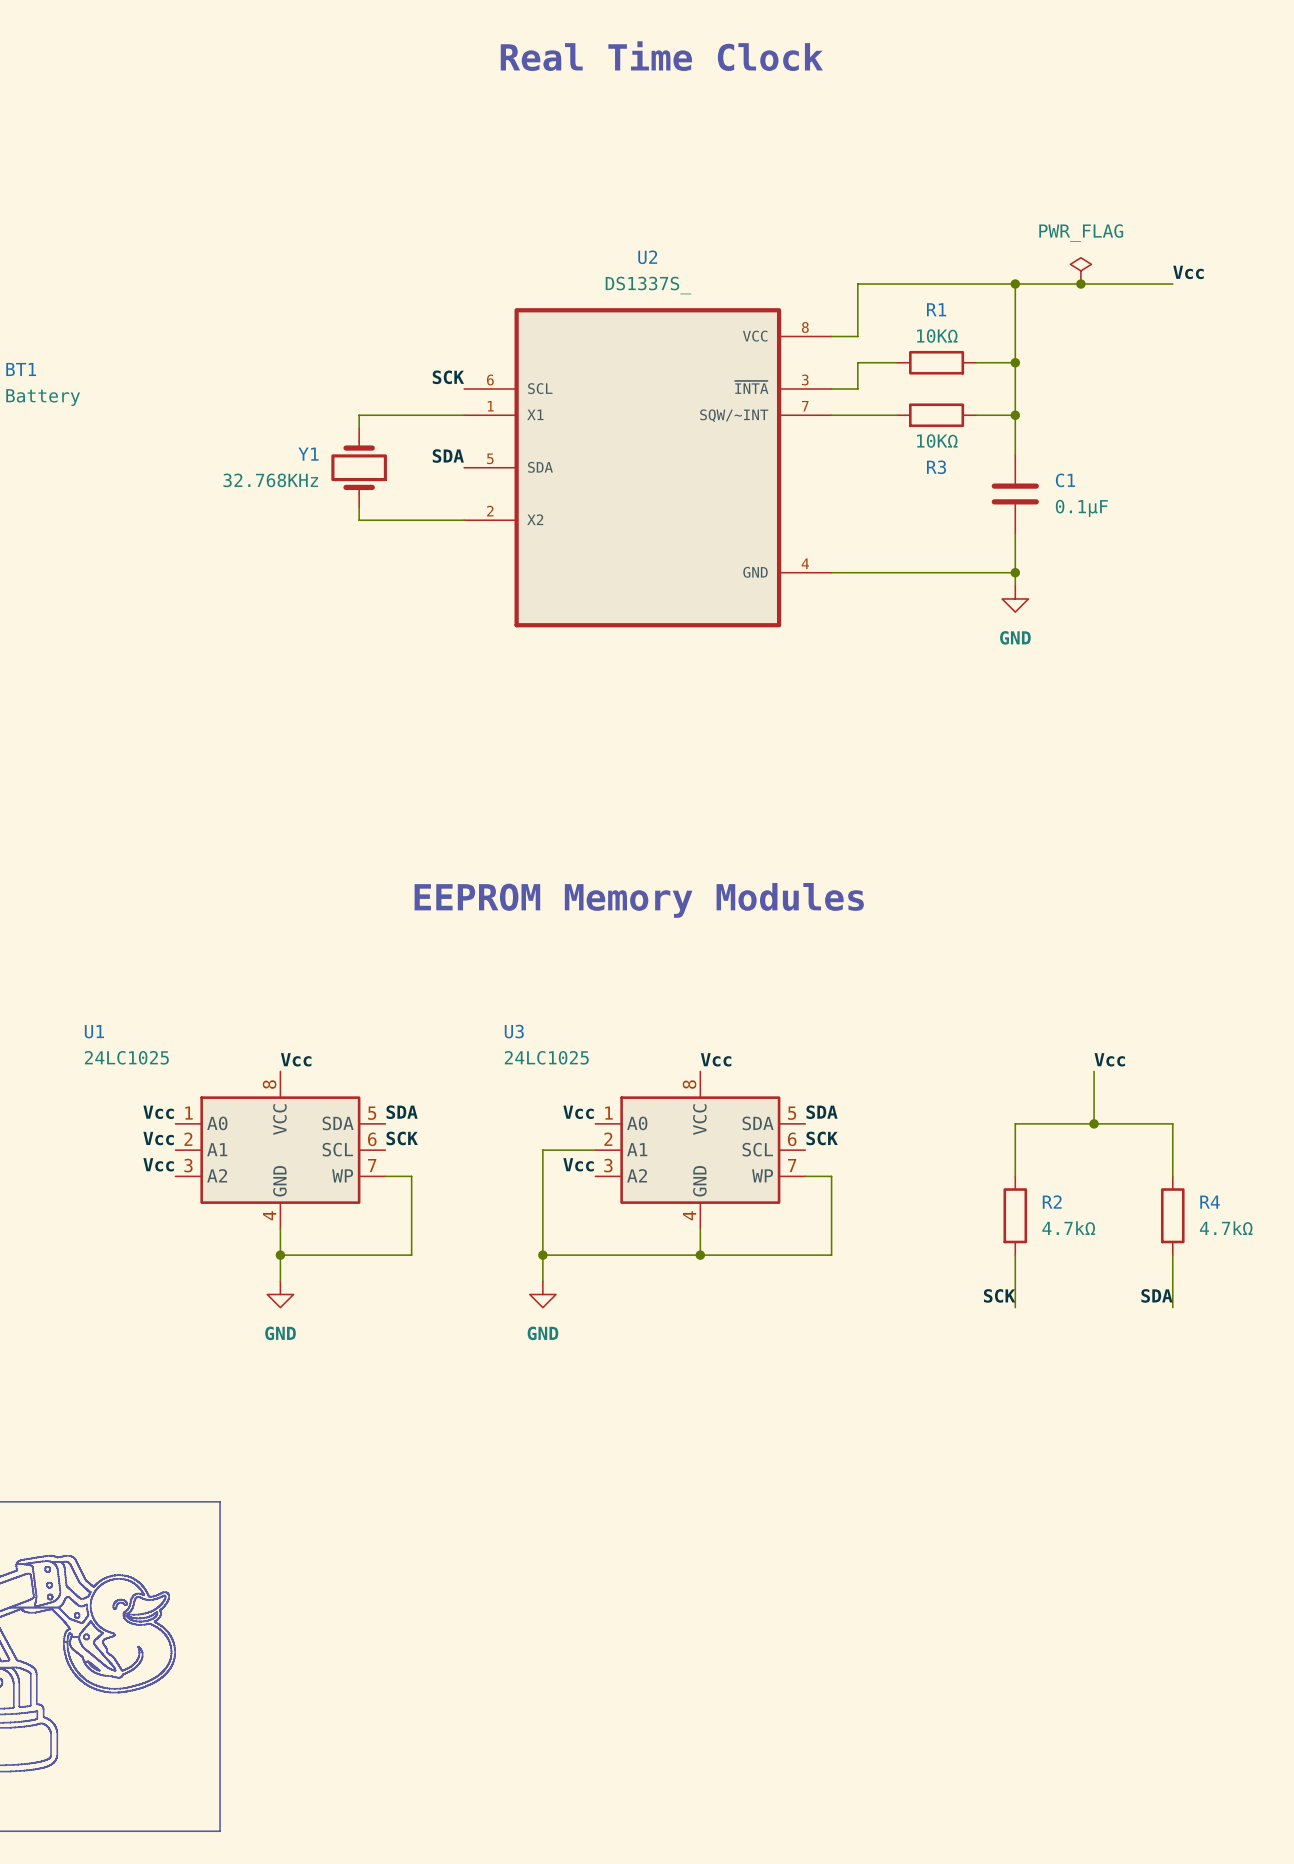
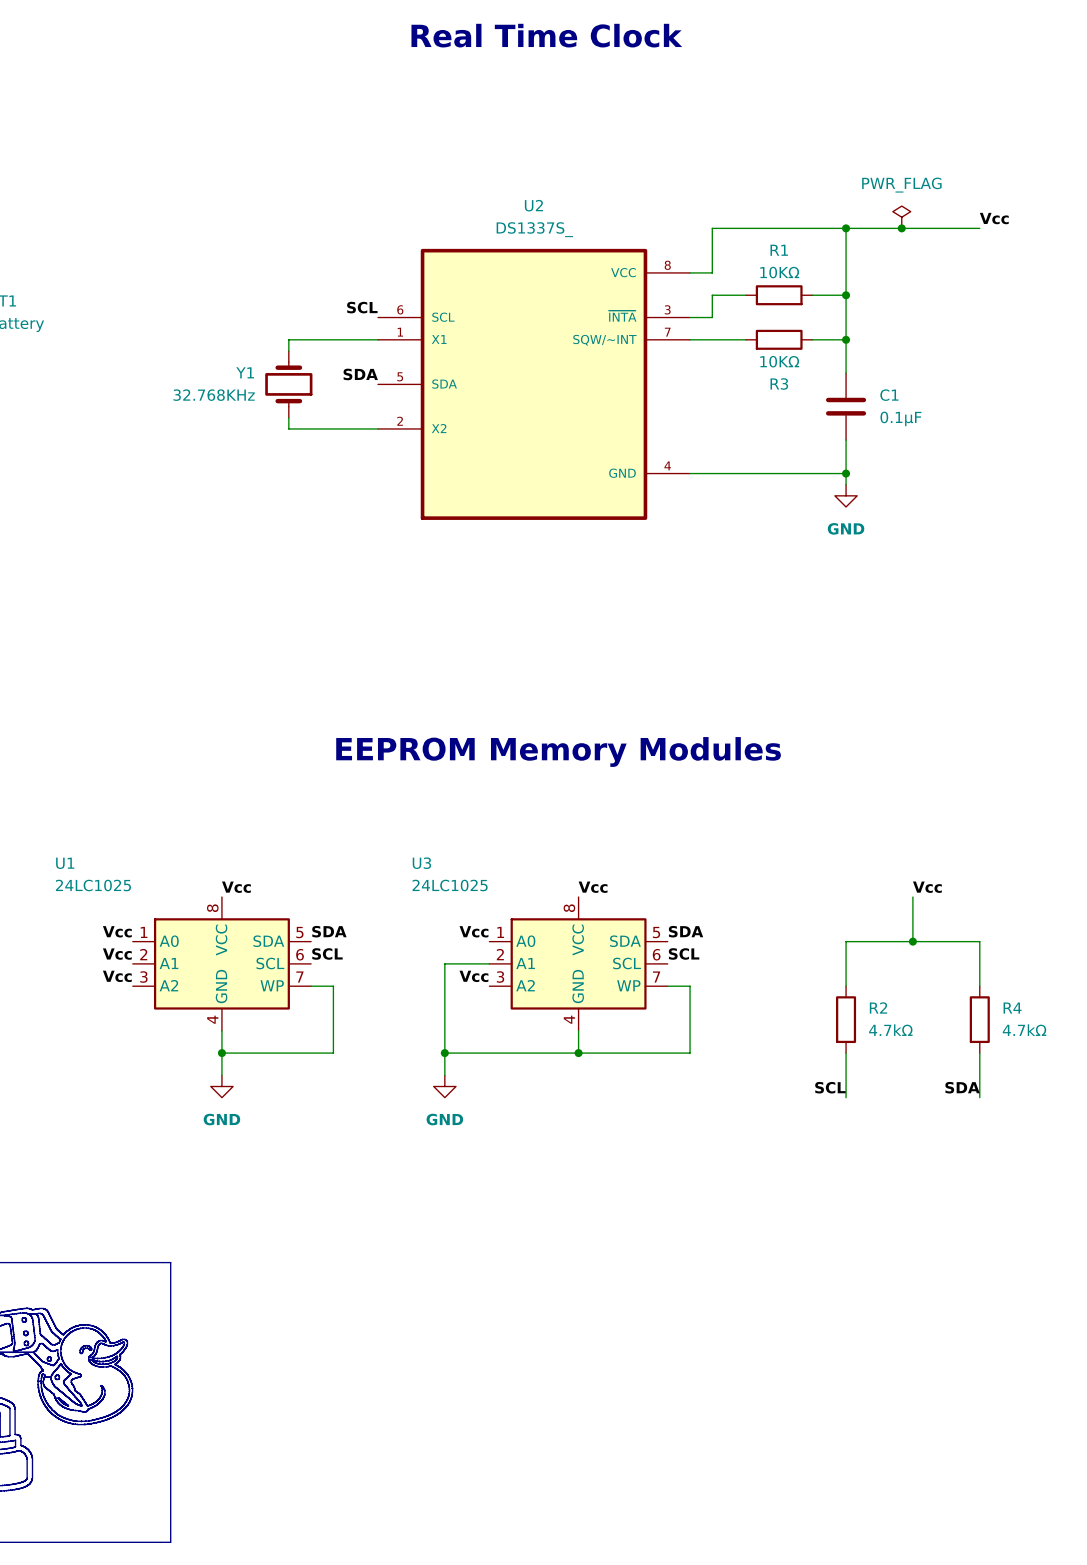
label: SCK (448, 377) -> SCL (362, 307)
label: SCK (402, 1138) -> SCL (327, 953)
label: SCK (822, 1138) -> SCL (684, 953)
label: SCK (999, 1295) -> SCL (830, 1087)

